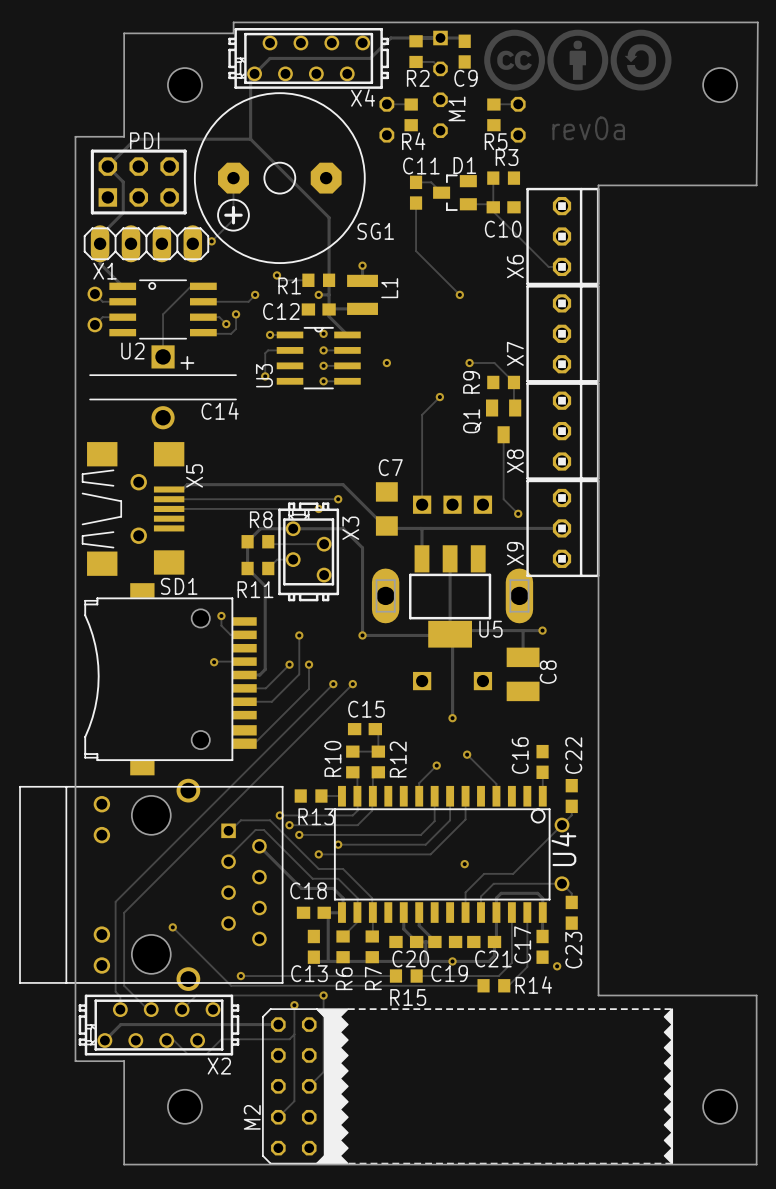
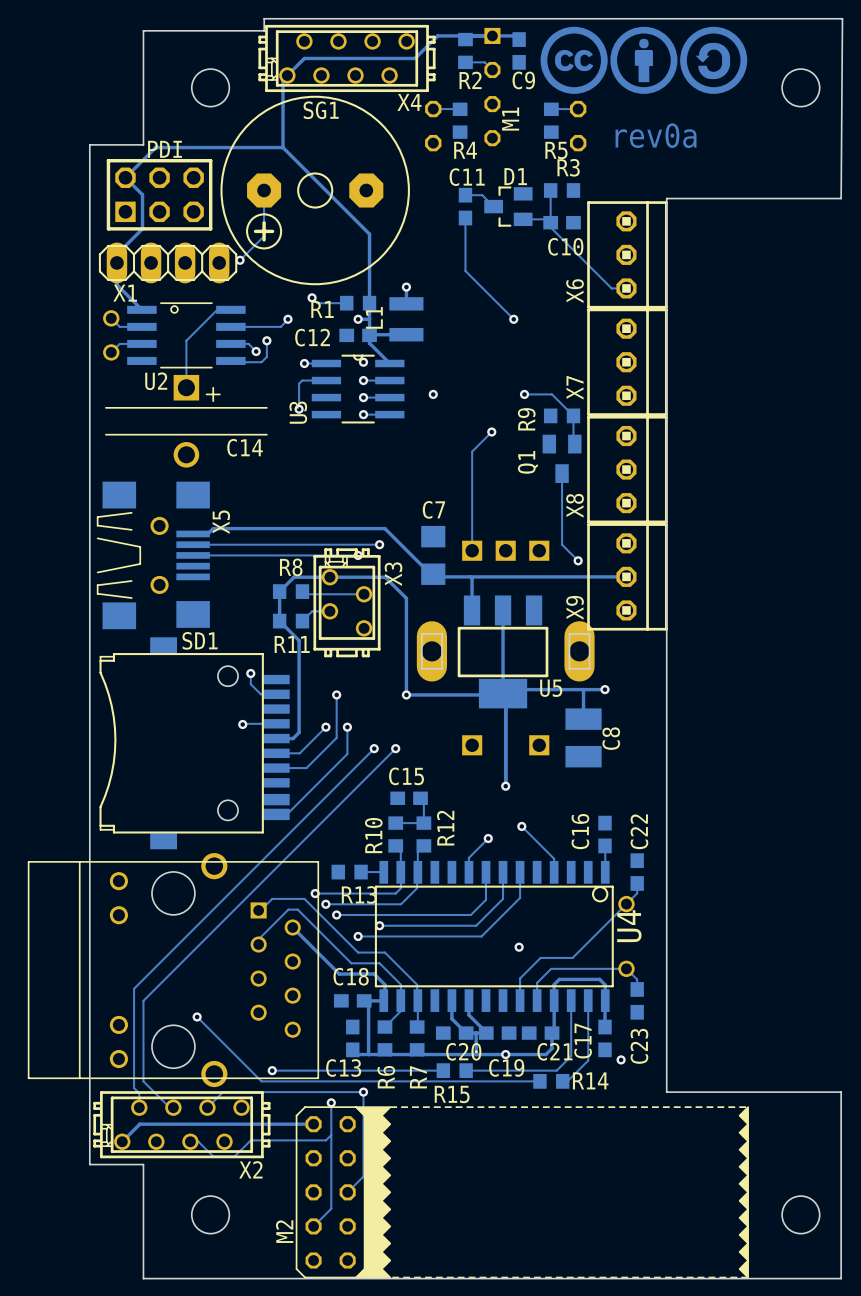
SG1 name position: SG1 (375, 231) -> SG1 (321, 110)
L1 name position: L1 (389, 288) -> L1 (374, 317)

